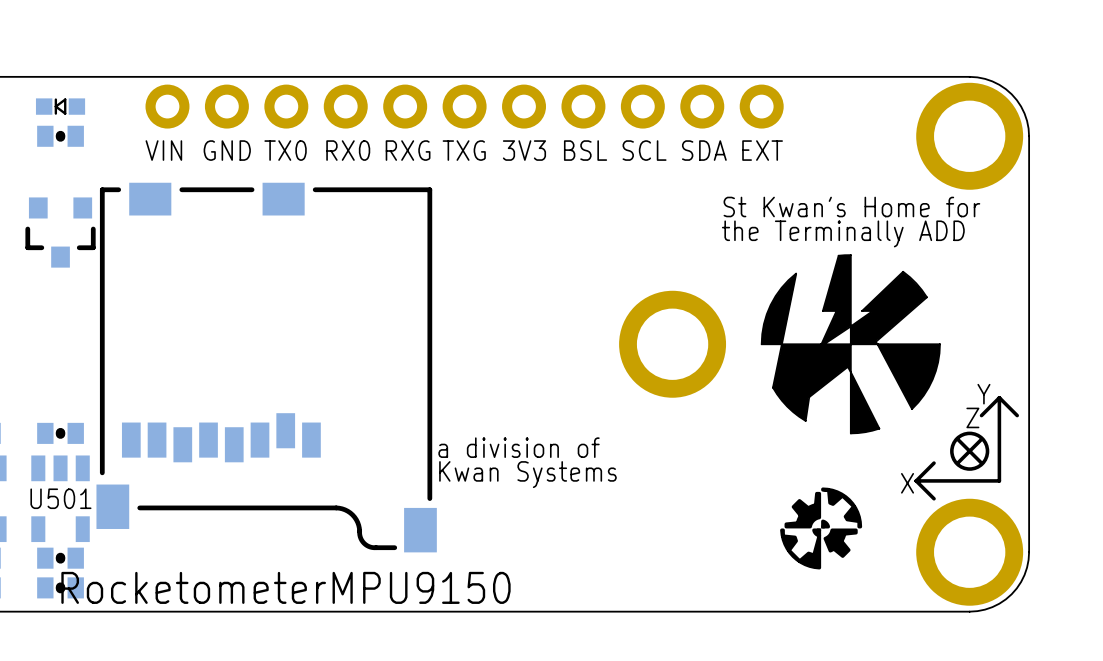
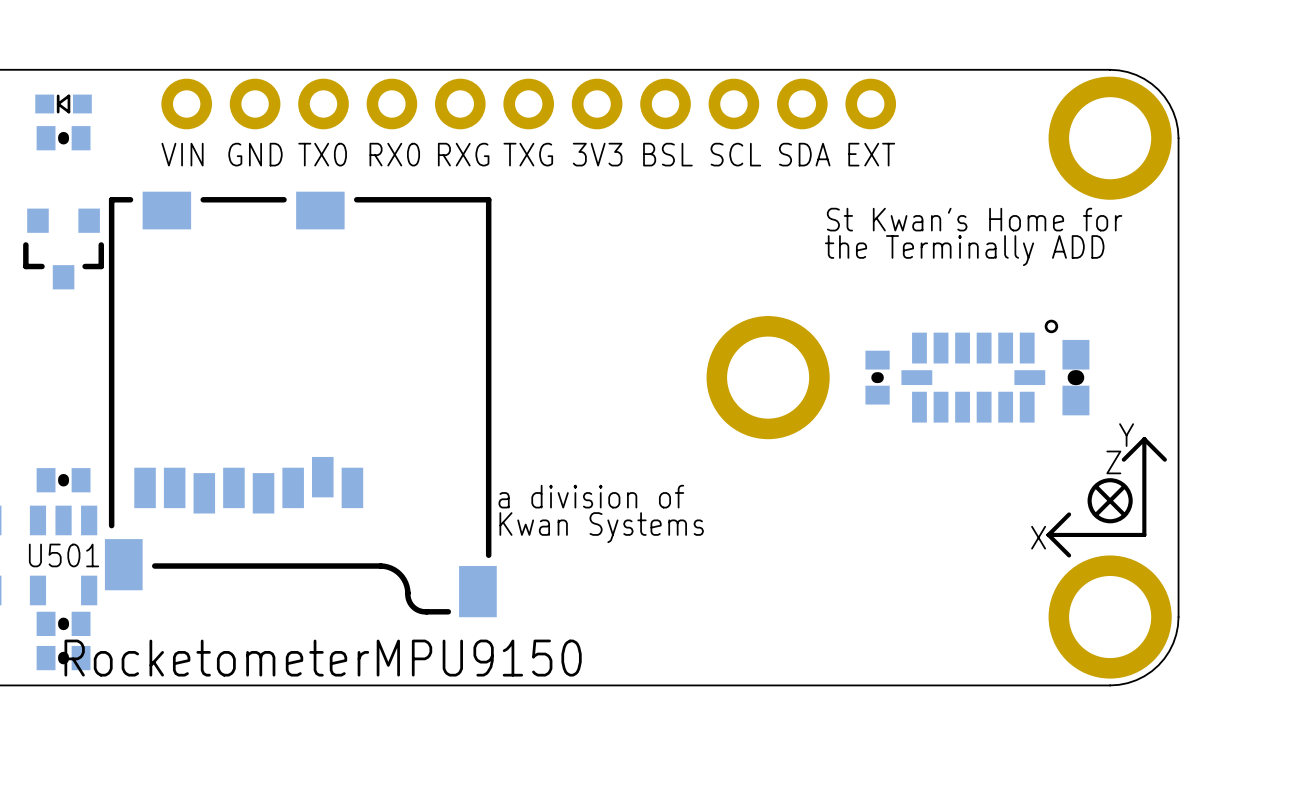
drawing: [761, 254, 941, 434] -> none
part: none -> (979, 371)
part: none -> (877, 377)
part: none -> (1075, 377)
drawing: [780, 487, 863, 570] -> none

